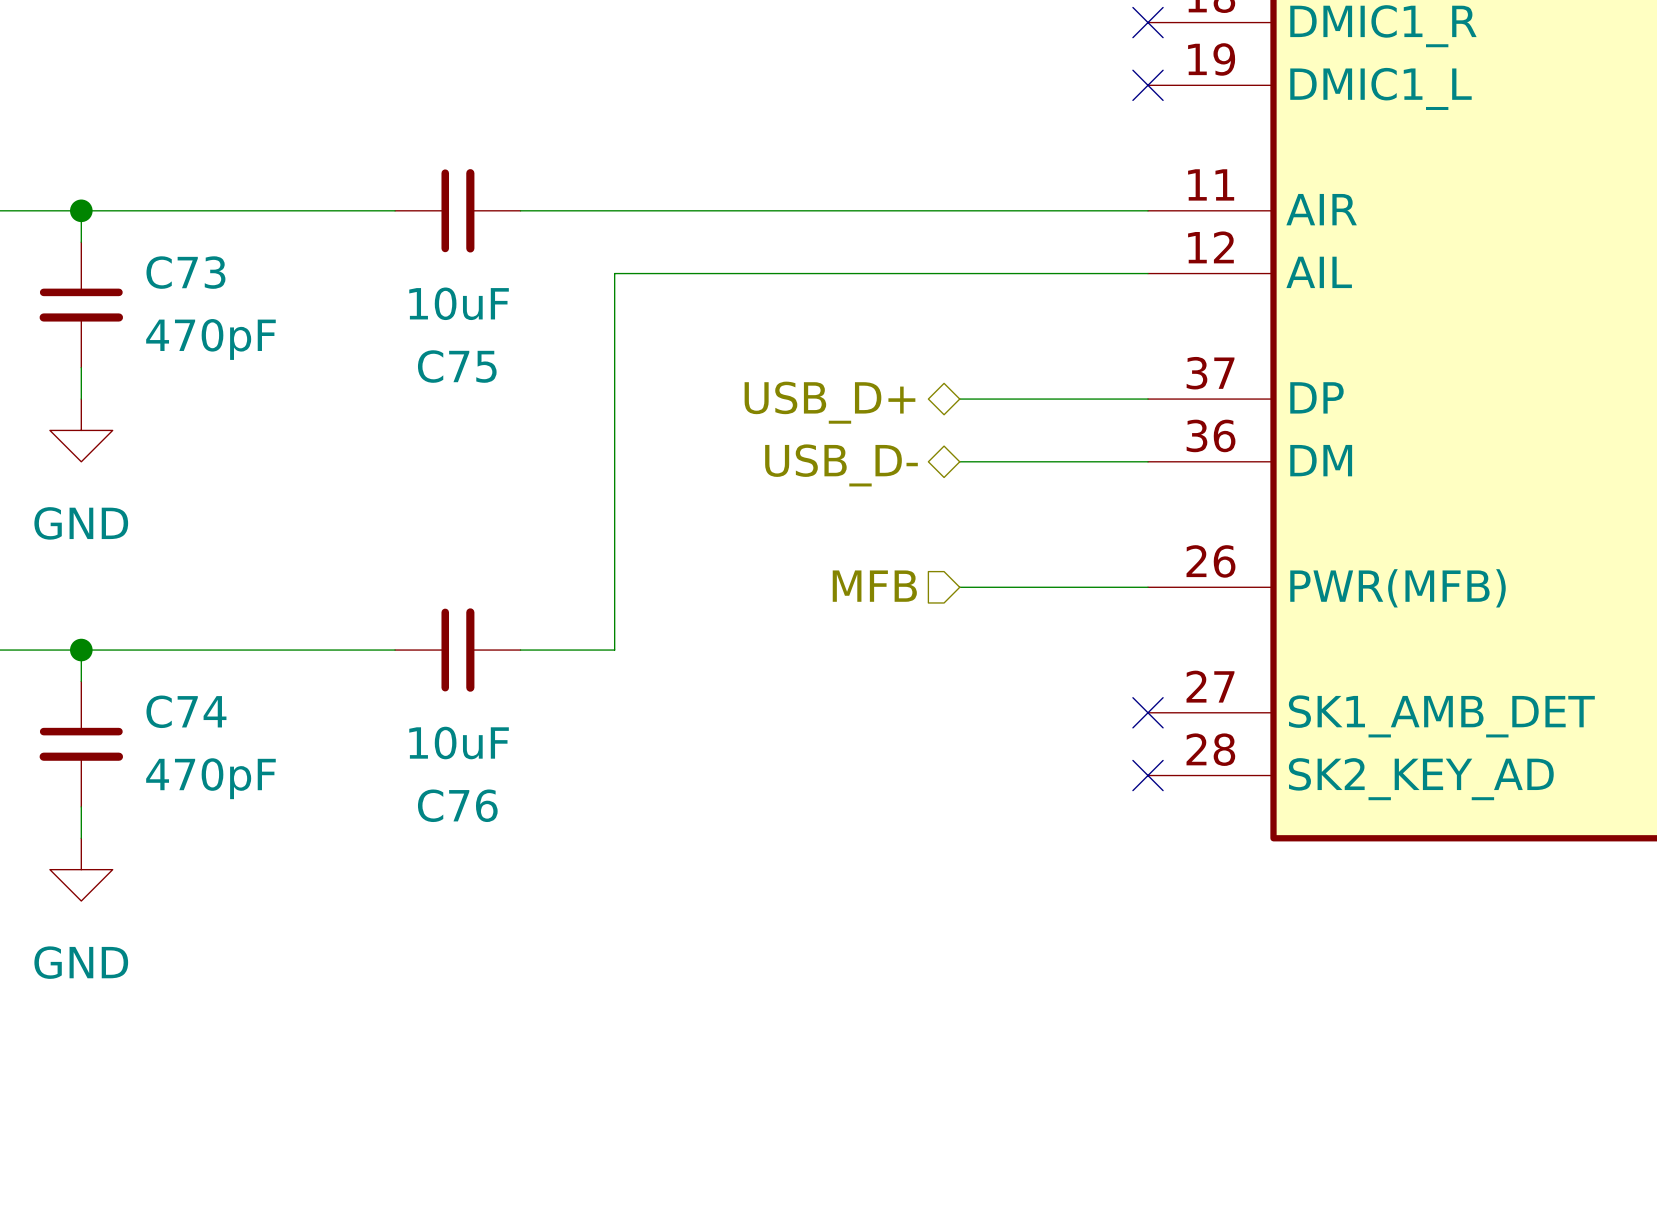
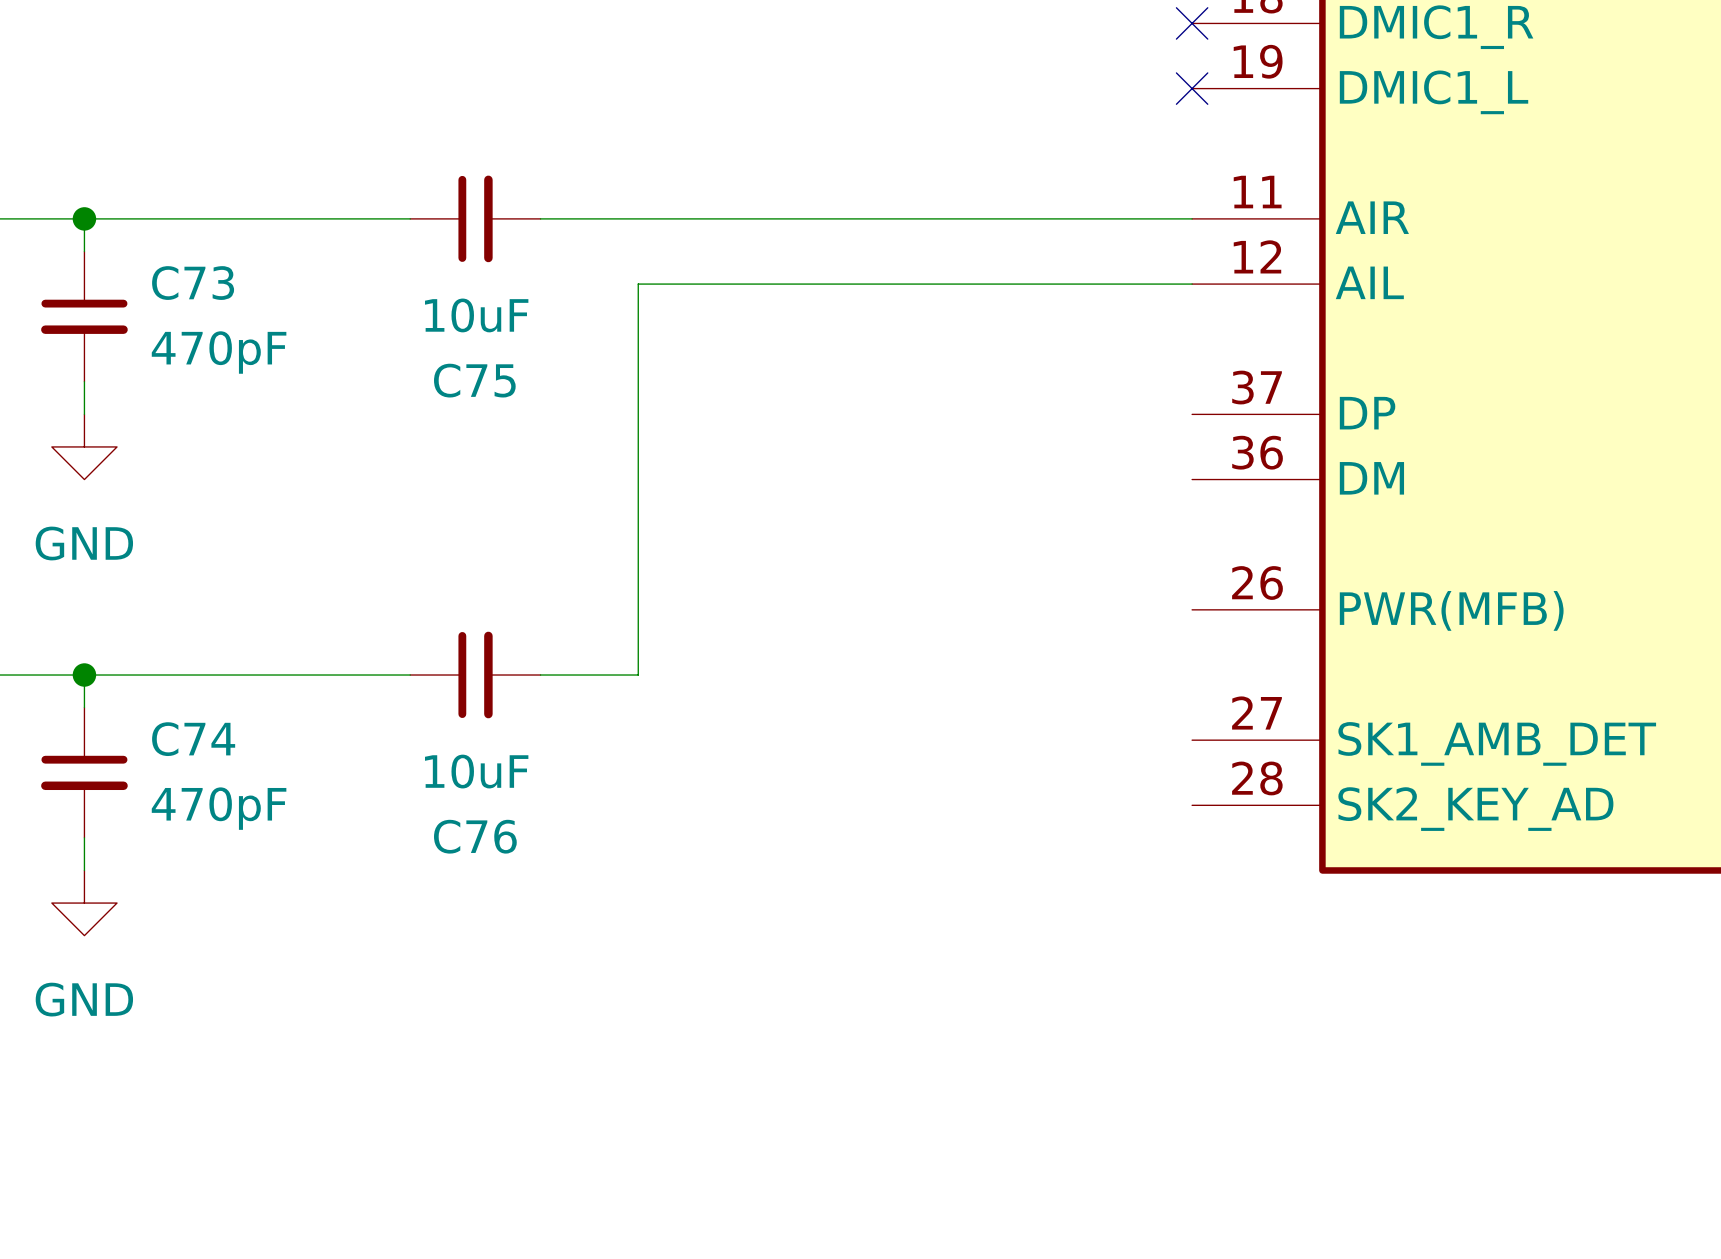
wire: (959, 399) (1148, 399) -> none
hierarchical label: USB_D+ (829, 402) -> none
wire: (959, 461) (1148, 461) -> none
hierarchical label: USB_D- (841, 465) -> none
hierarchical label: MFB (874, 586) -> none
wire: (959, 587) (1148, 587) -> none
no-connect mark: (1148, 712) -> none
no-connect mark: (1148, 775) -> none

